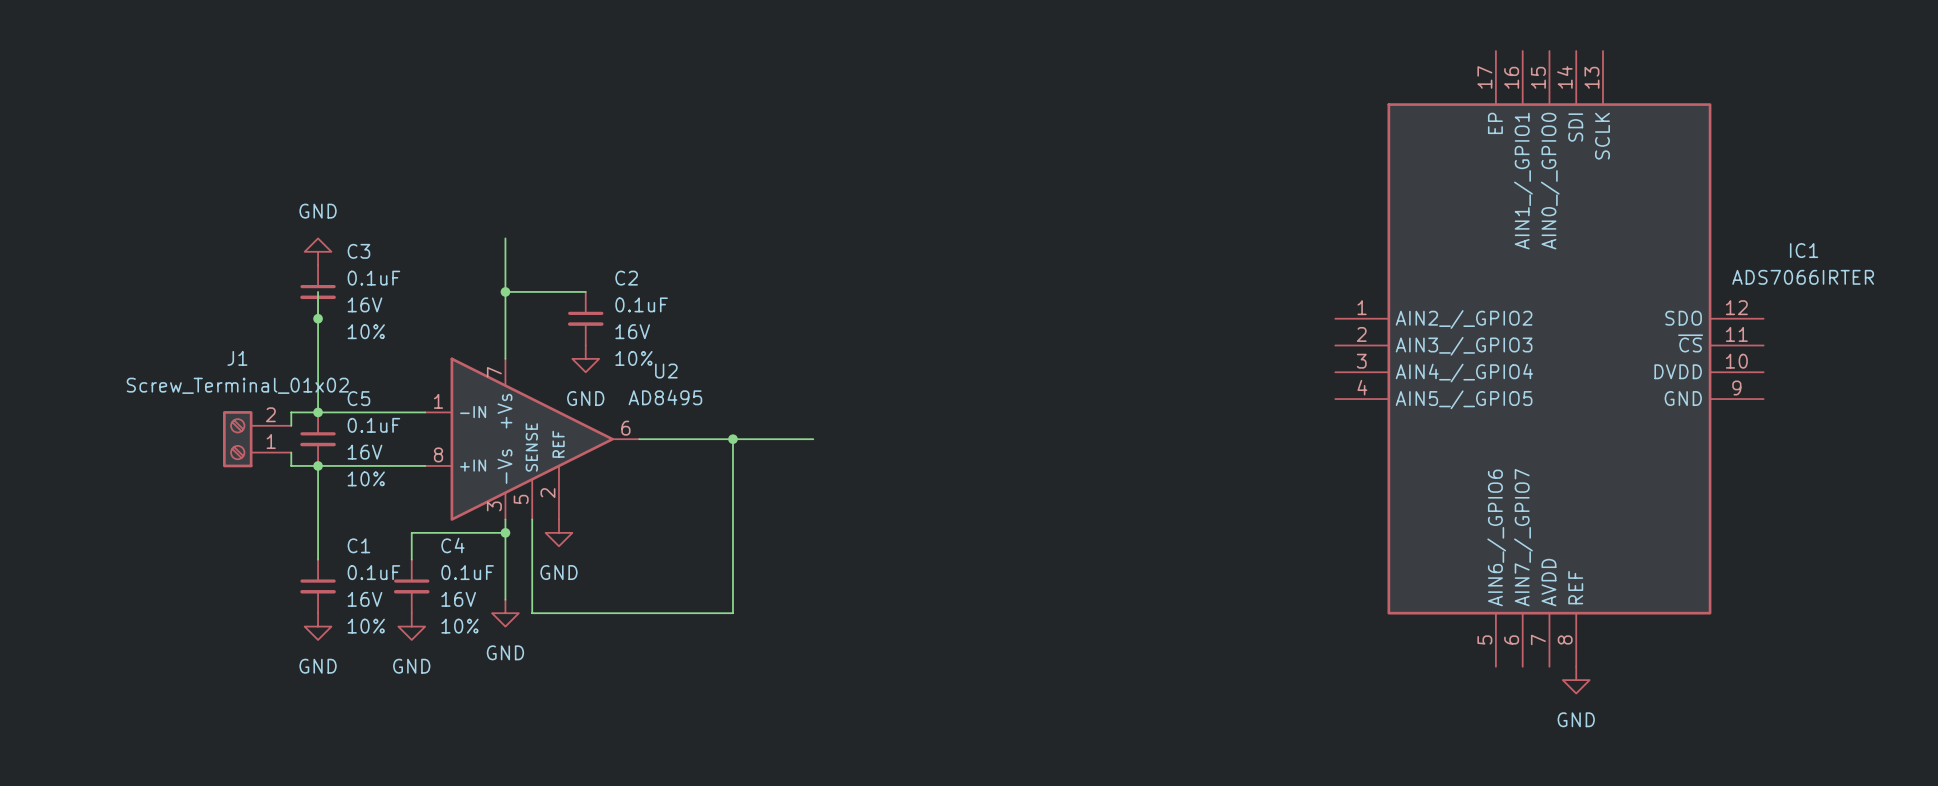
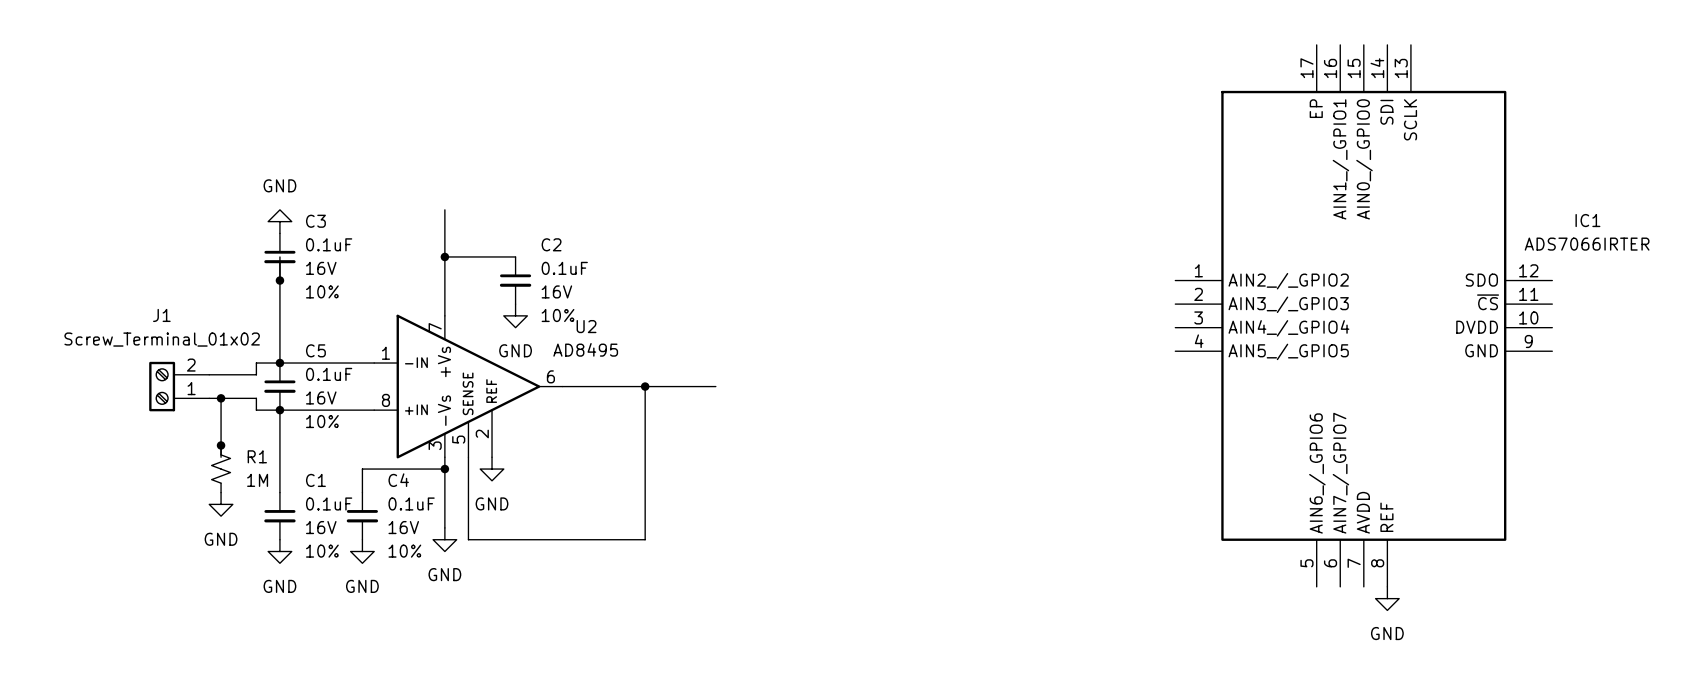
J1 position: (257, 439) -> (179, 386)
wire: none -> (221, 398) (221, 457)
junction: none -> (221, 398)
junction: none -> (221, 445)
R1: none -> 1M (221, 469)
power symbol: none -> GND (221, 504)

